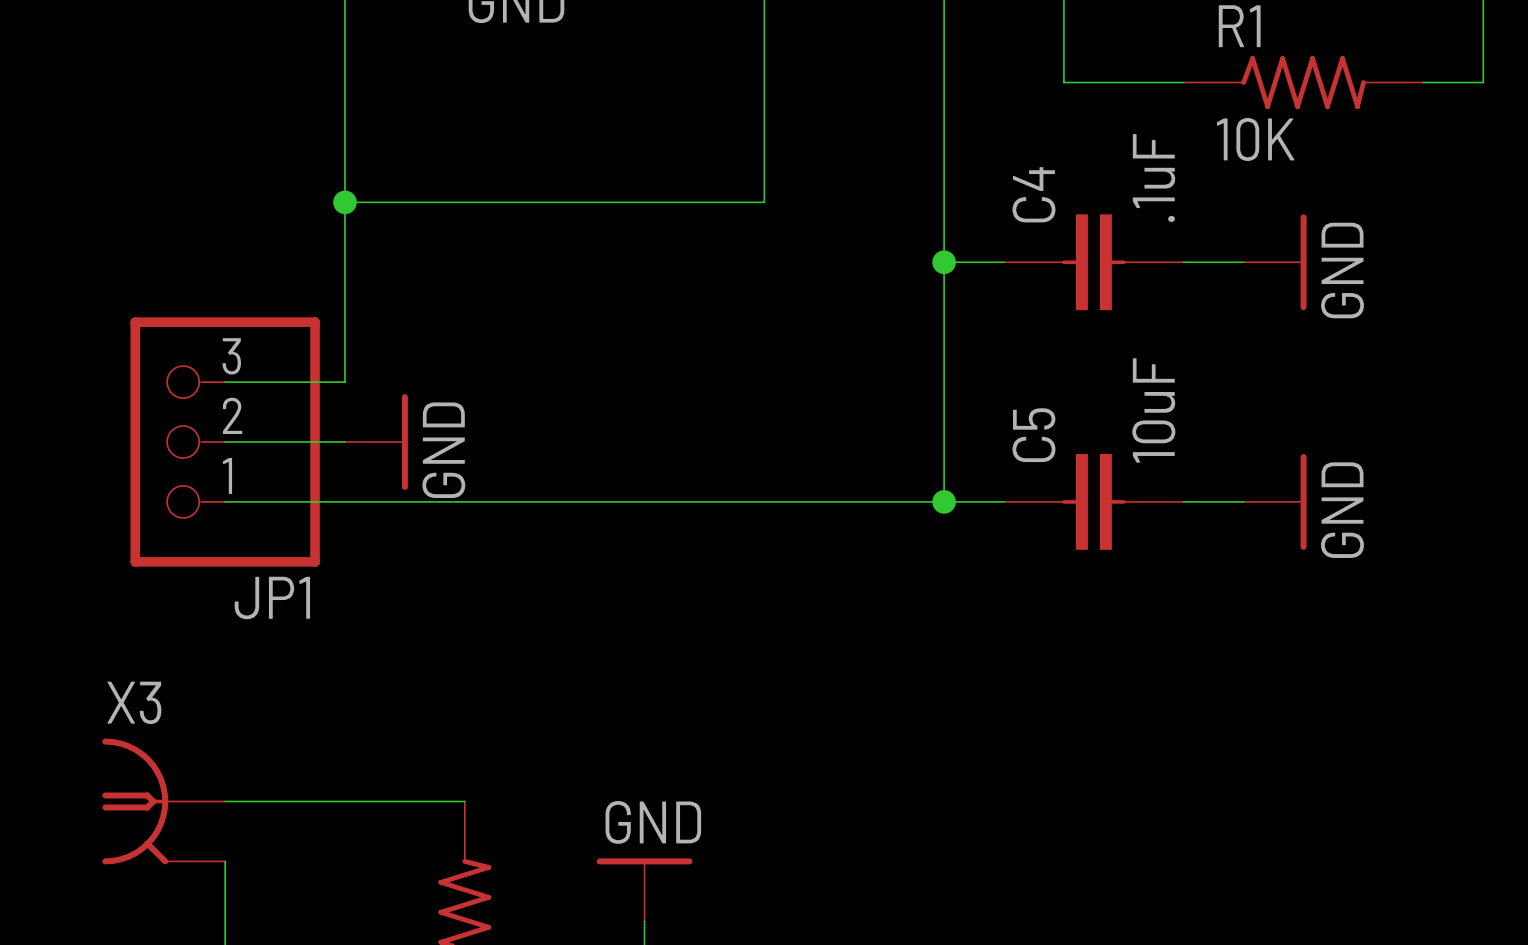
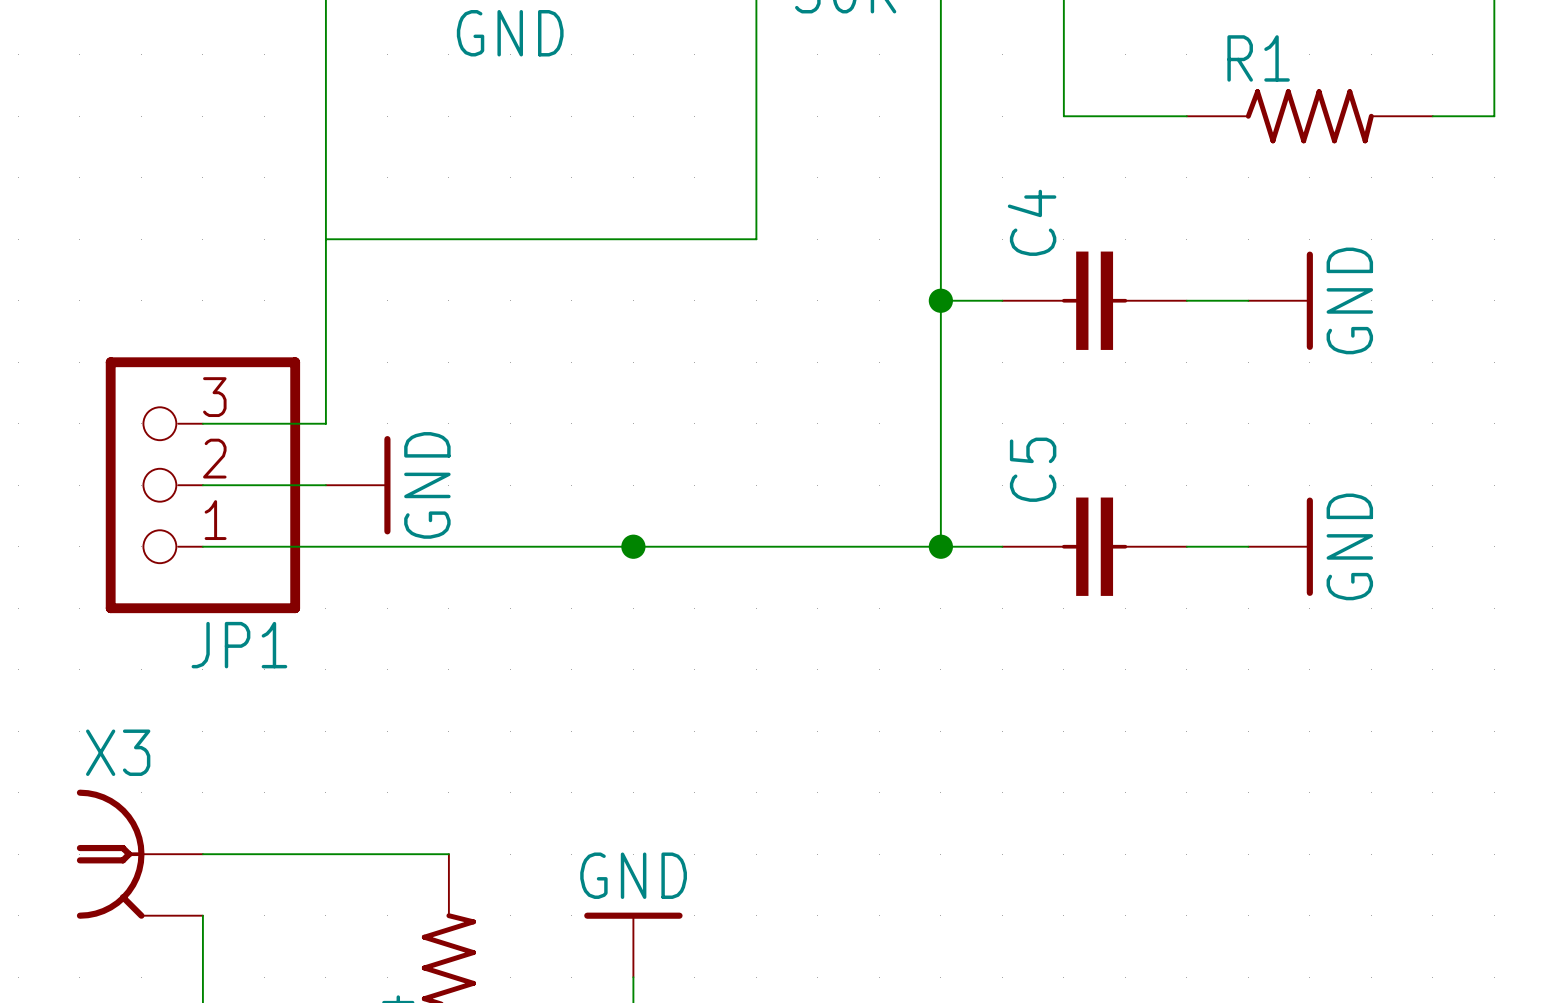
R1 value: 10K (1255, 139) -> none
C4 value: .1uF (1154, 178) -> none
junction: (344, 202) -> none
C5 value: 10uF (1153, 410) -> none
junction: none -> (633, 546)

